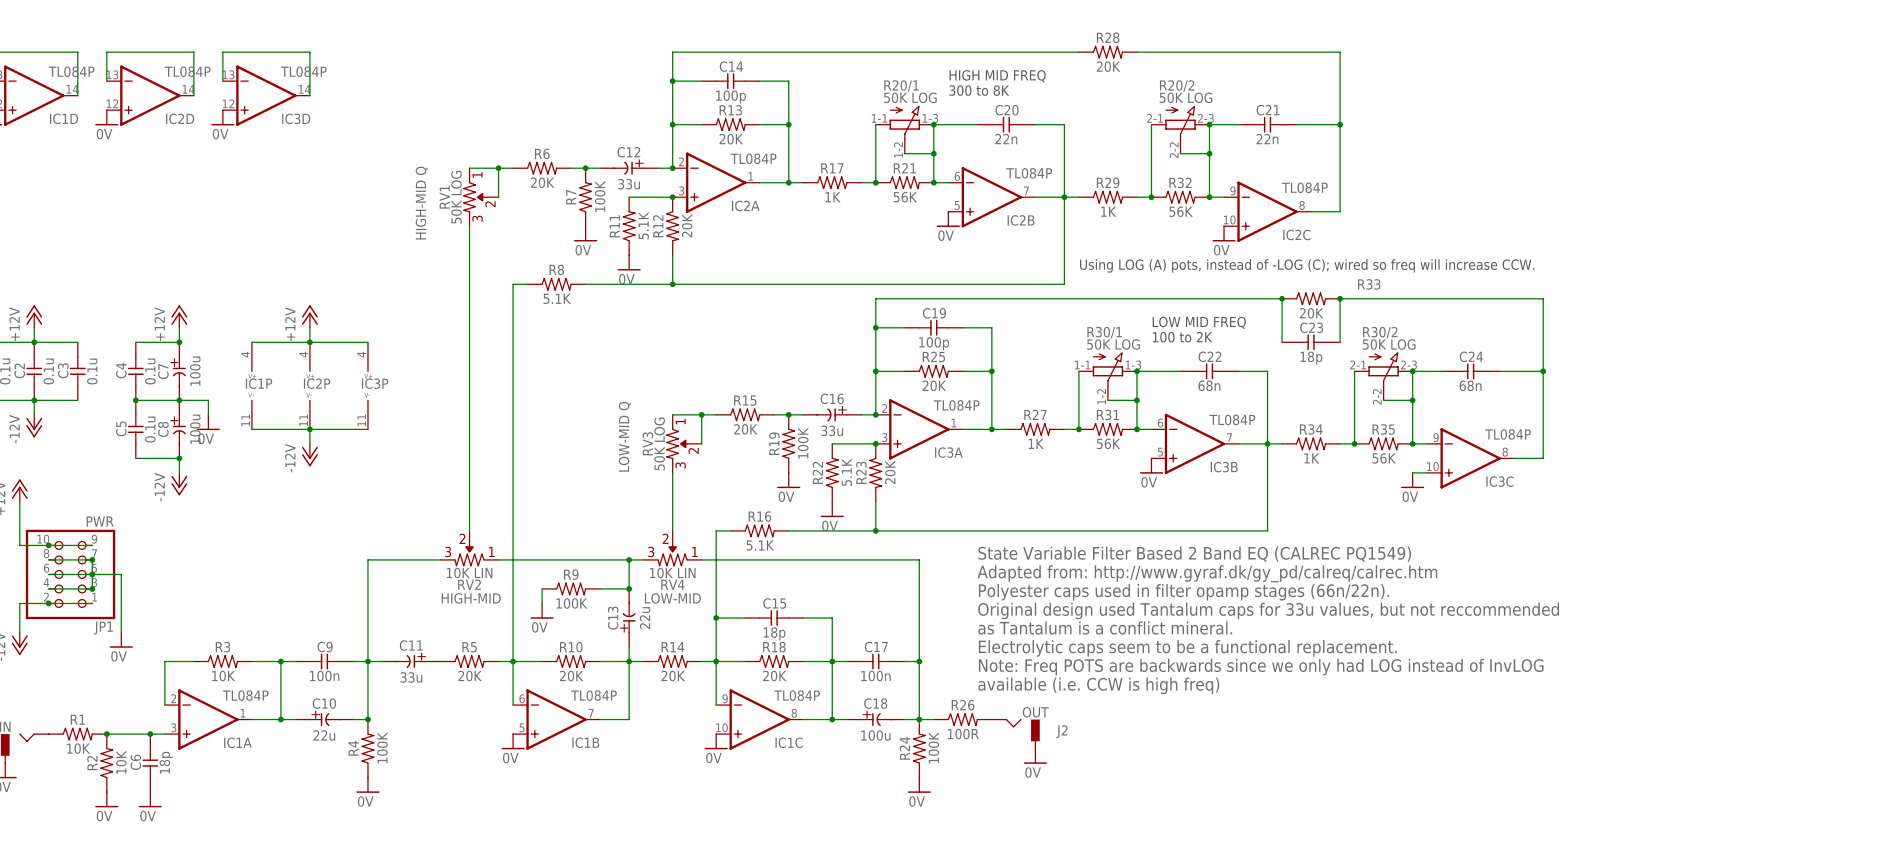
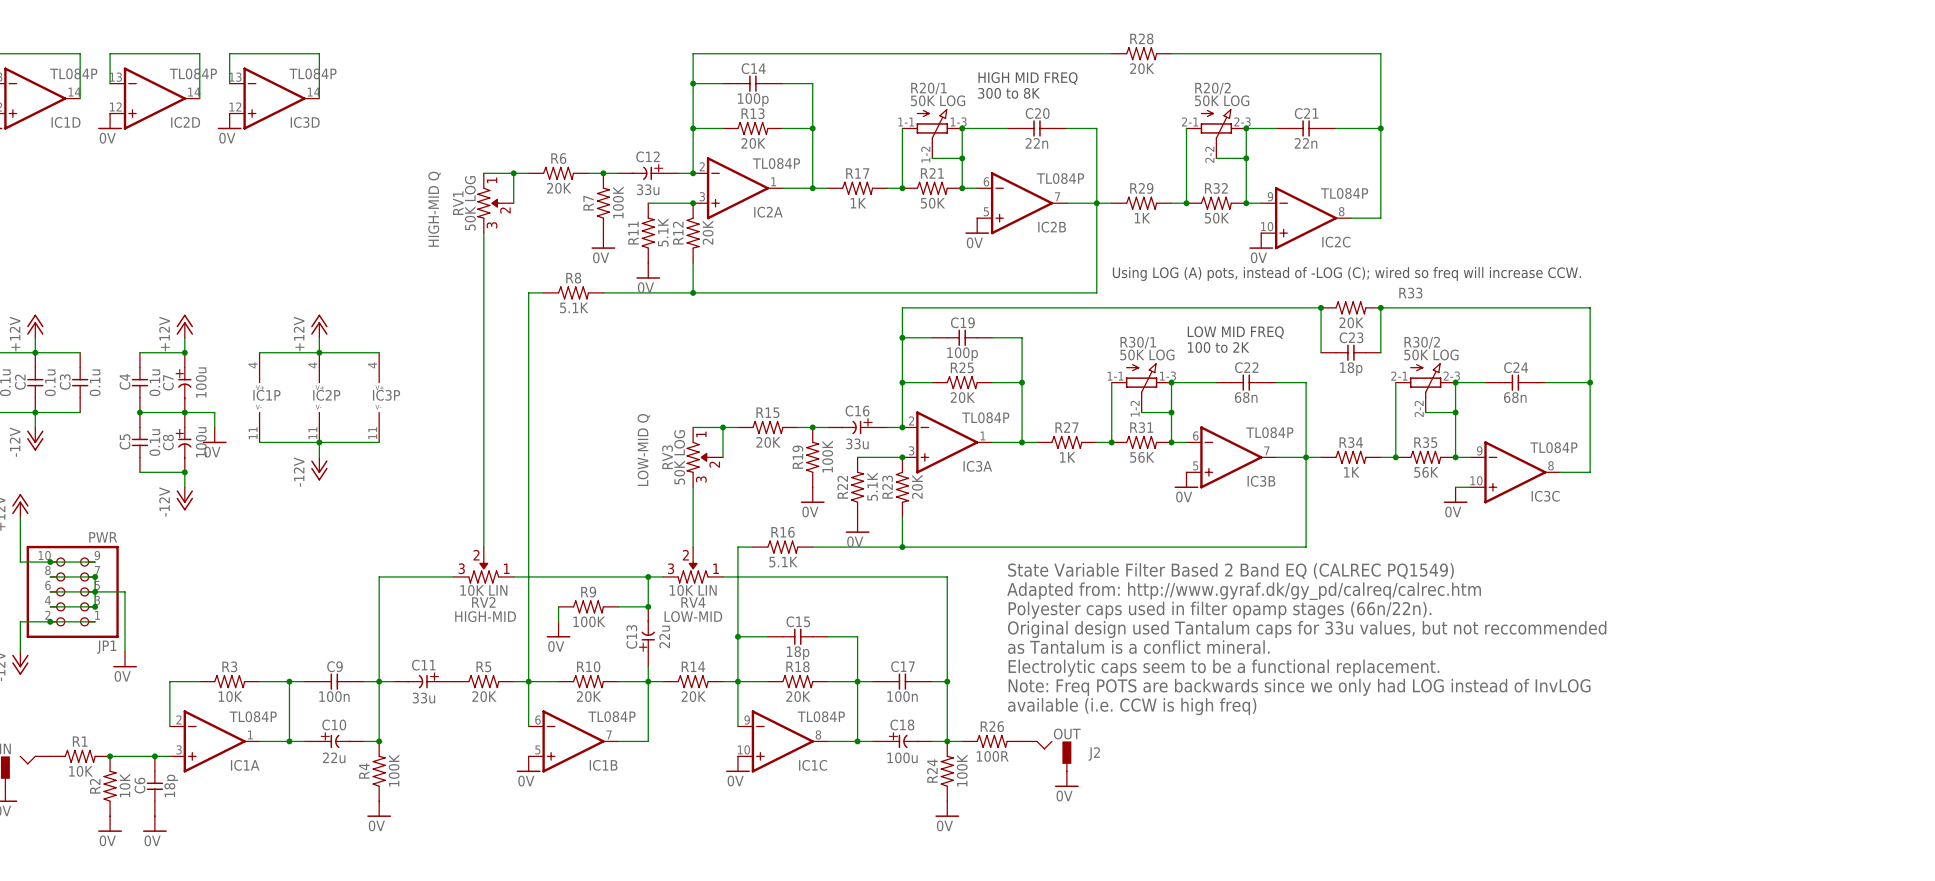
R21 value: 56K (905, 197) -> 50K (932, 203)
R32 value: 56K (1181, 211) -> 50K (1217, 218)

